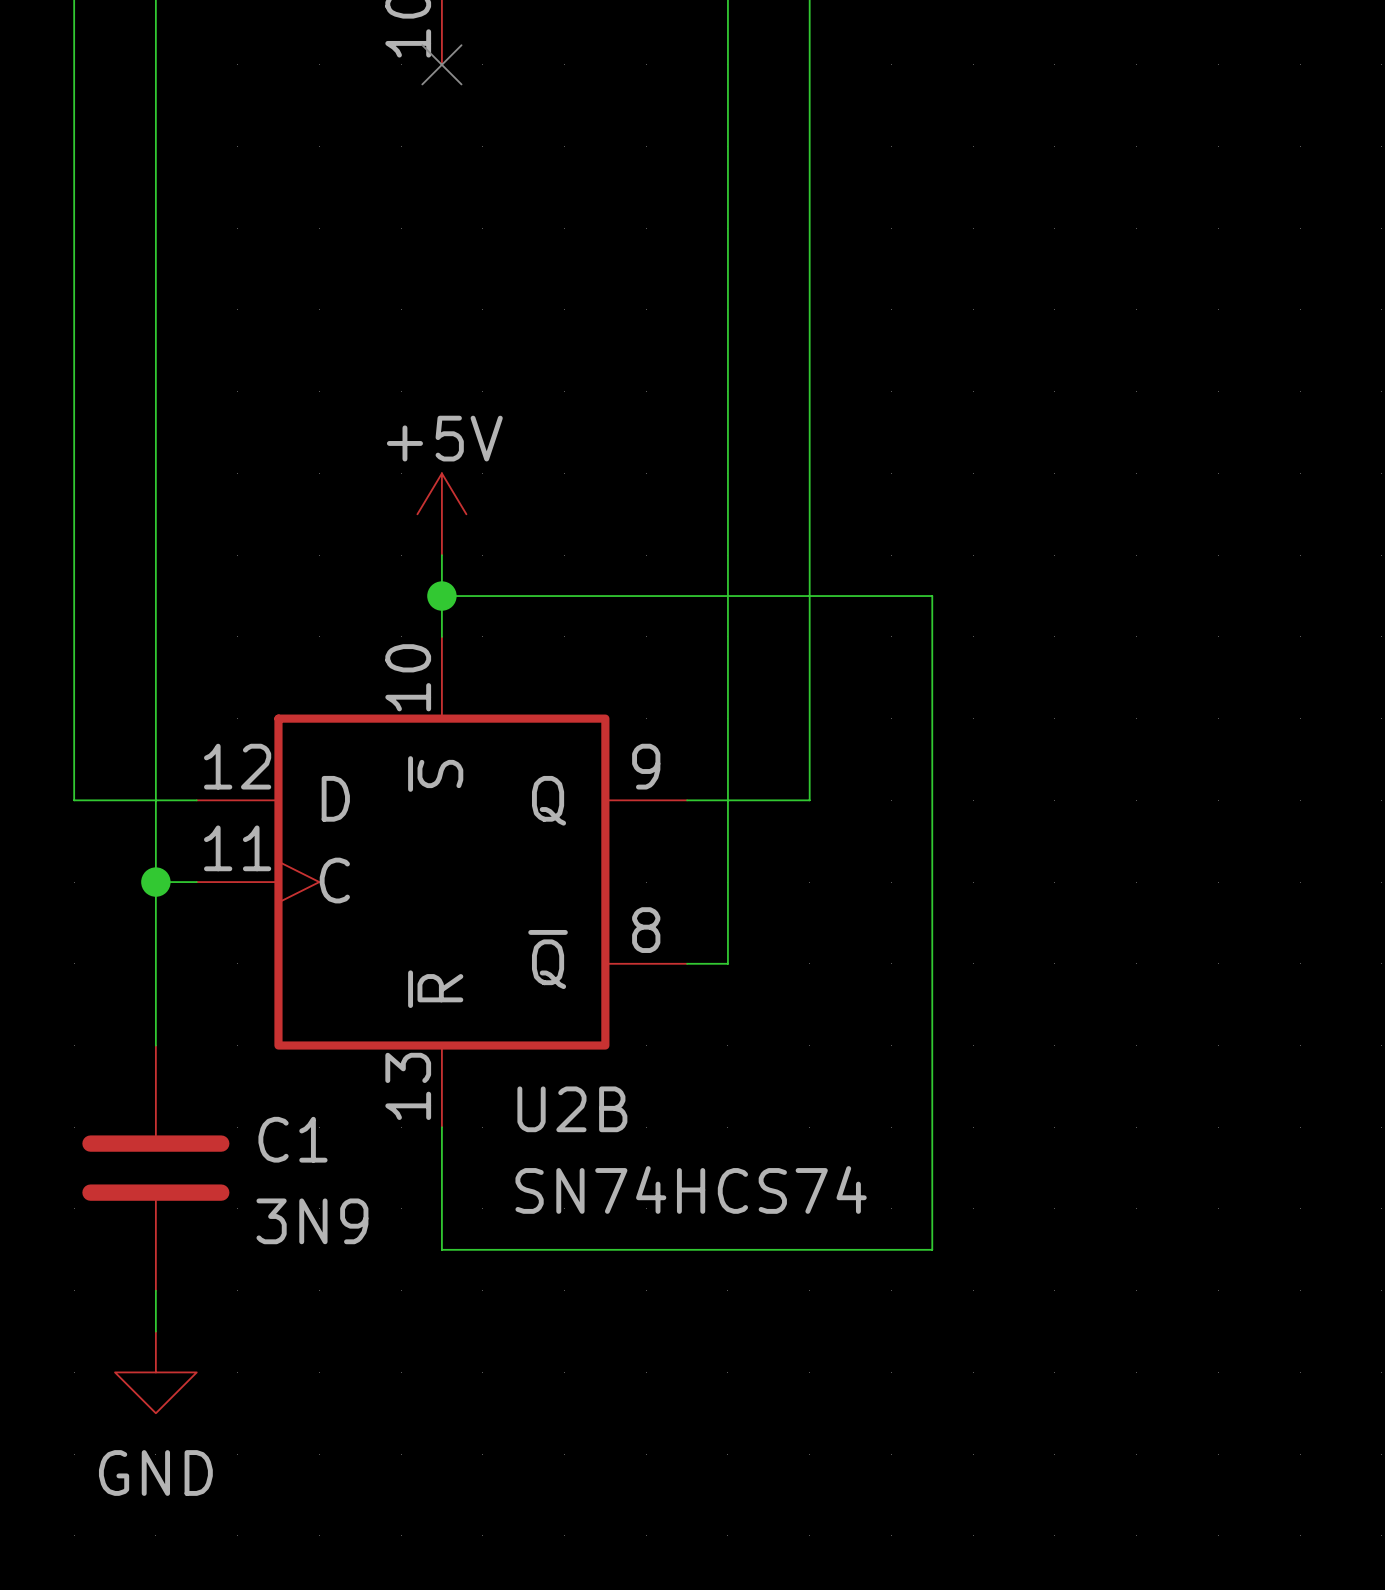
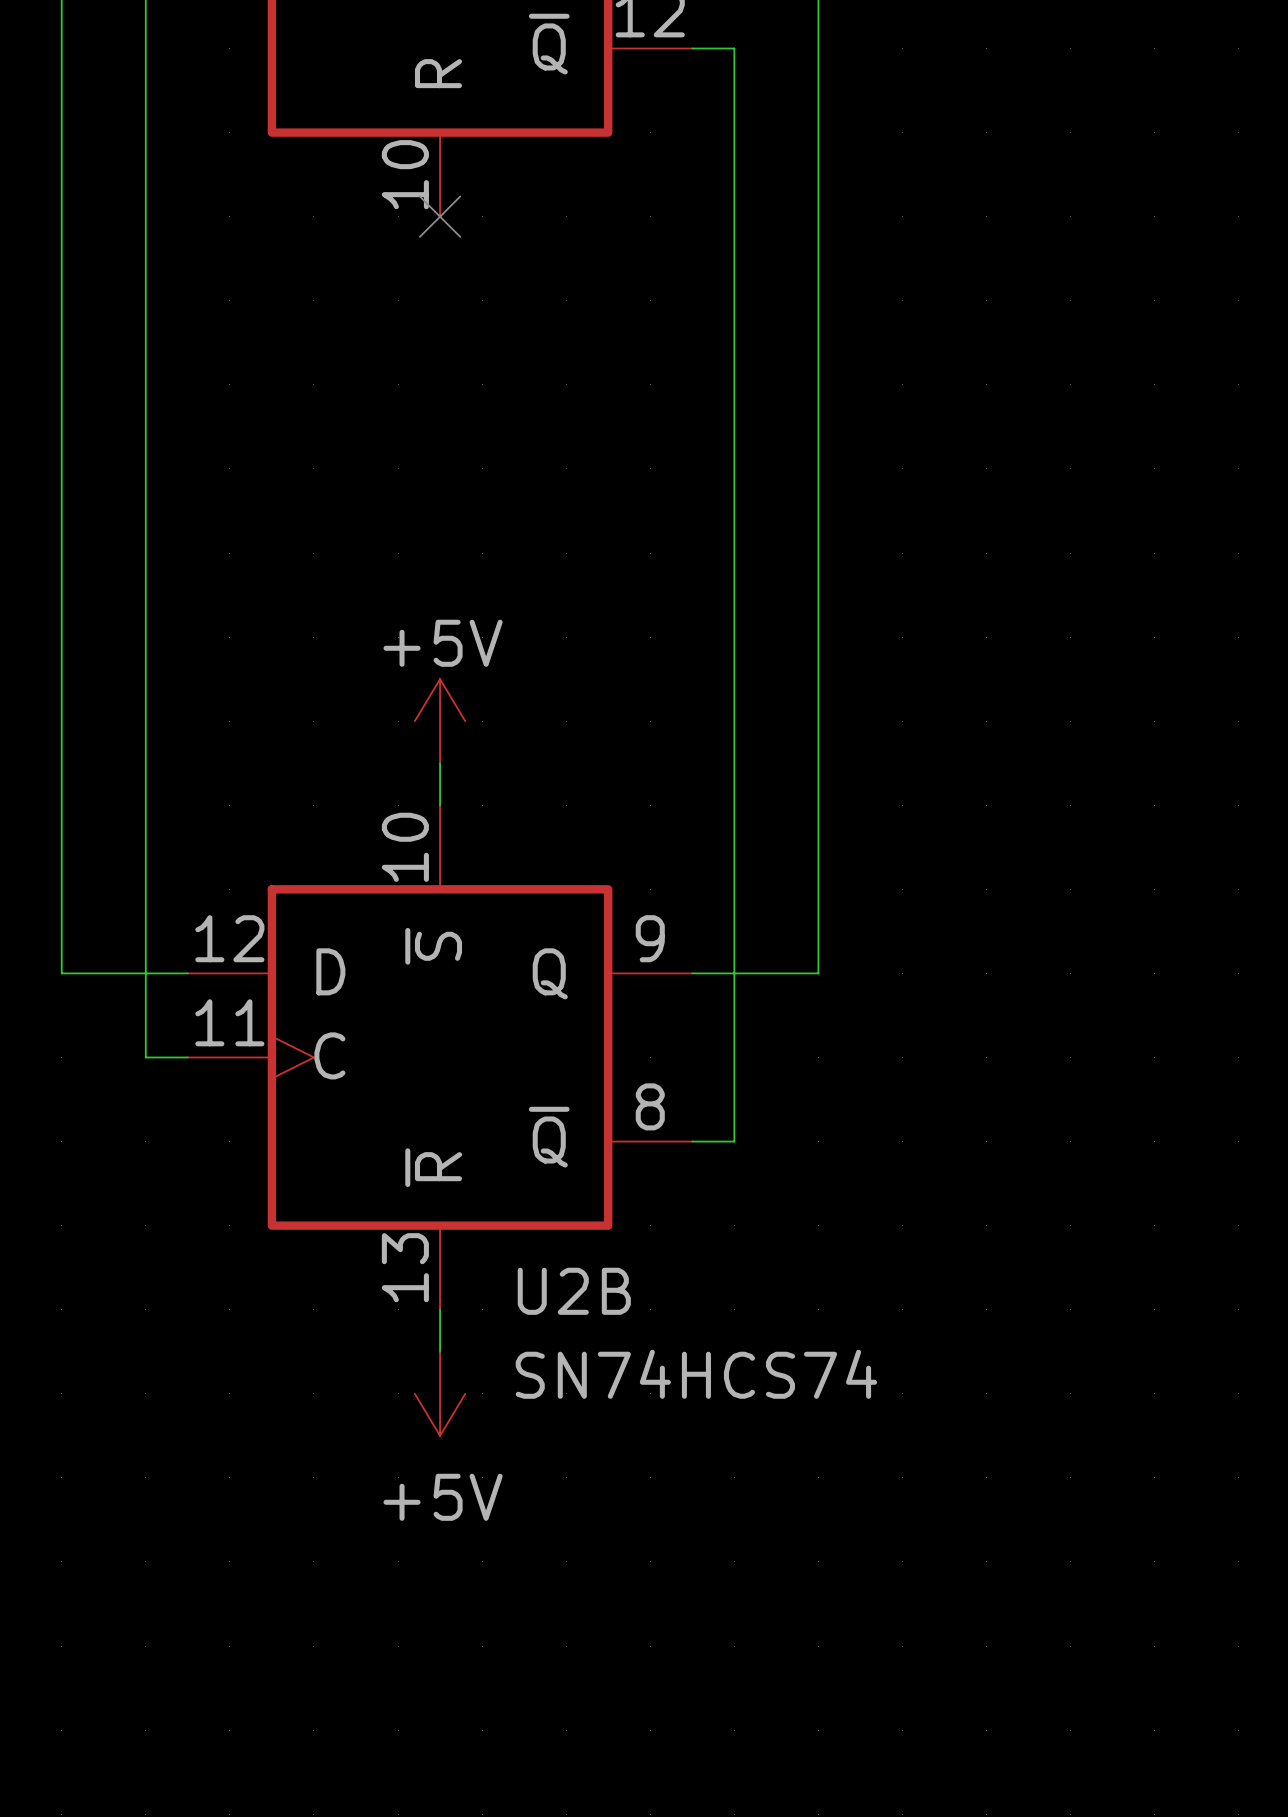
power symbol position: +5V (441, 514) -> +5V (440, 721)
wire: (441, 555) (441, 596) (932, 596) (932, 1249) (441, 1249) (441, 1168) -> none
junction: (441, 596) -> none
wire: (155, 882) (155, 1045) -> none
junction: (155, 882) -> none
C1: 3N9 (155, 1168) -> none
power symbol: none -> +5V (440, 1393)
wire: (155, 1290) (155, 1331) -> none
power symbol: GND (155, 1372) -> none

